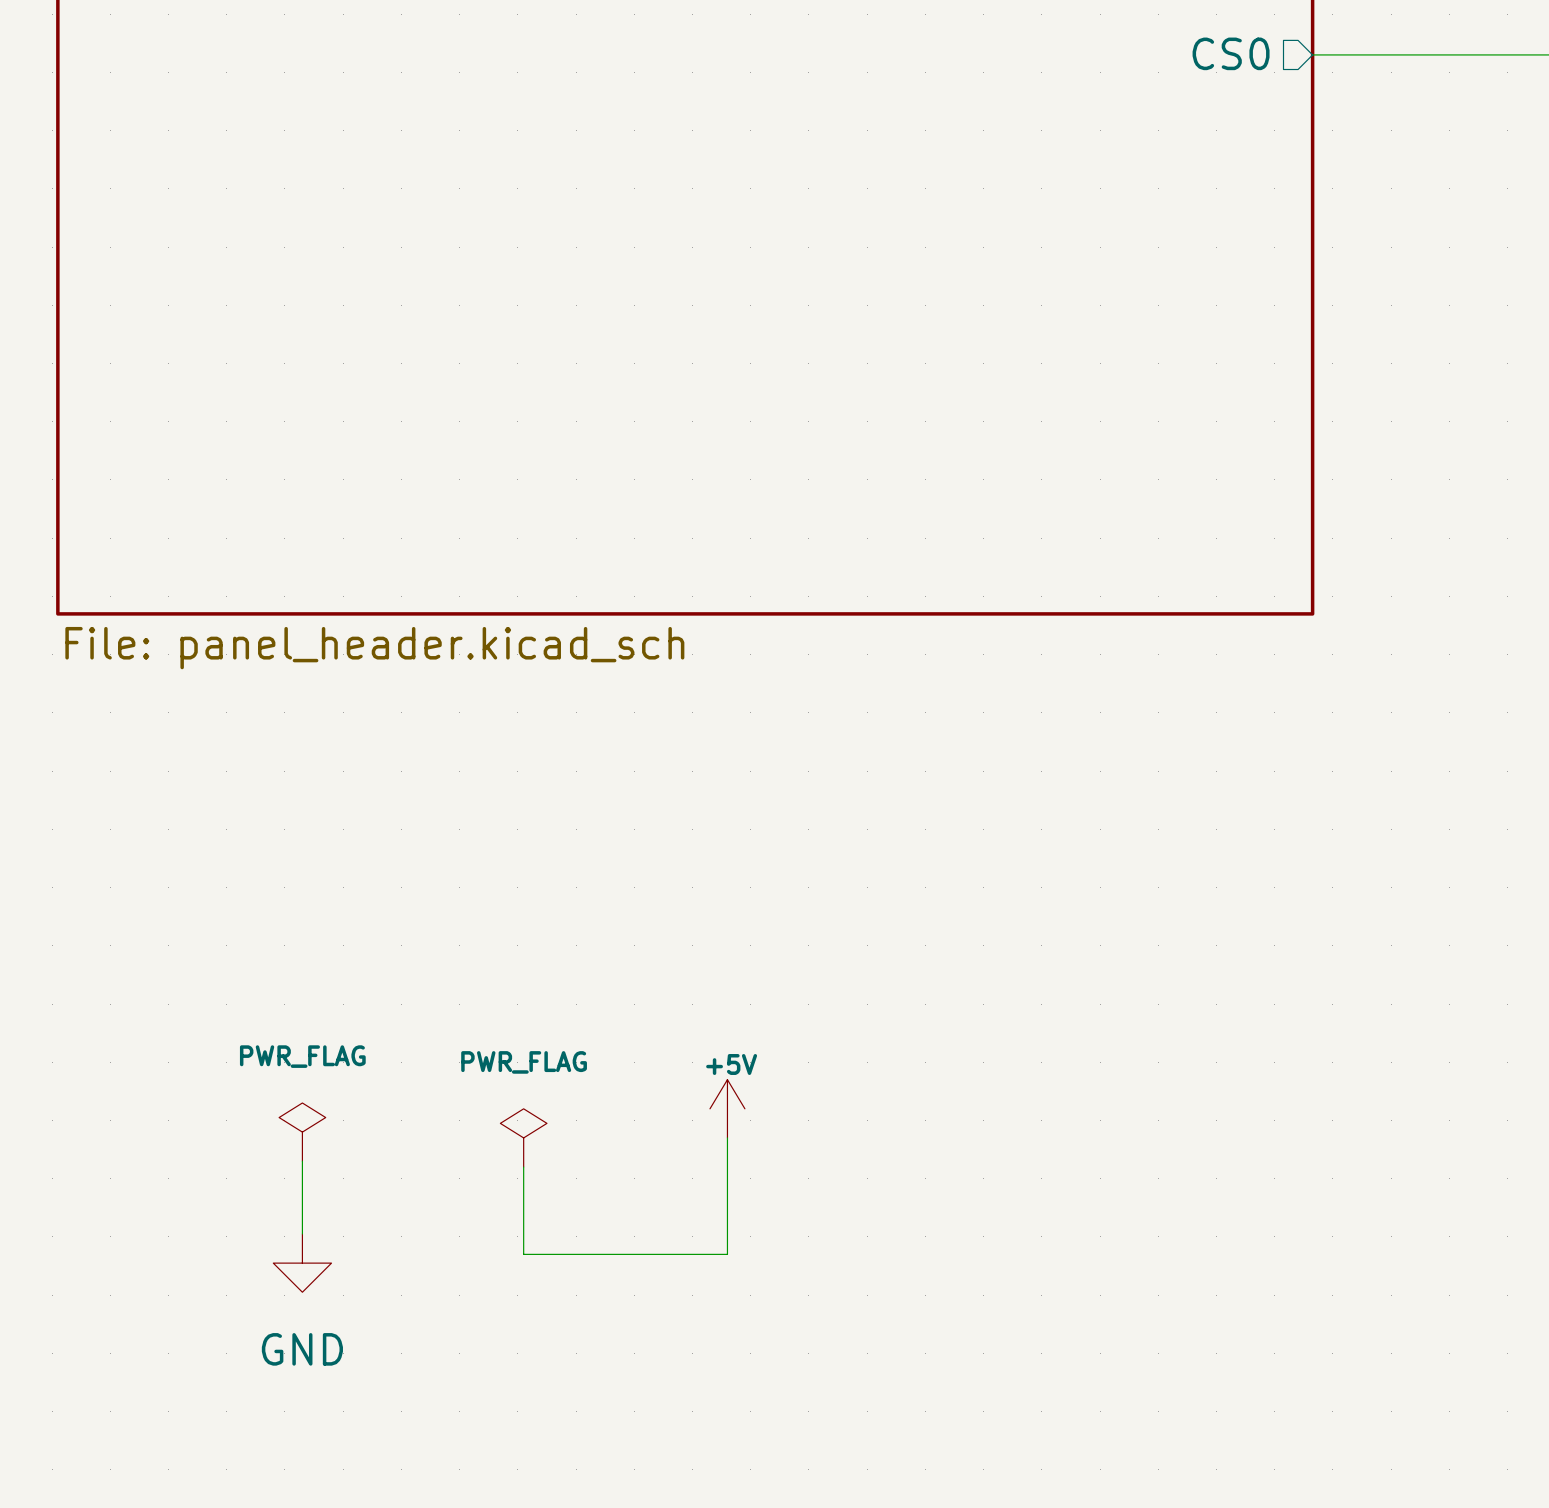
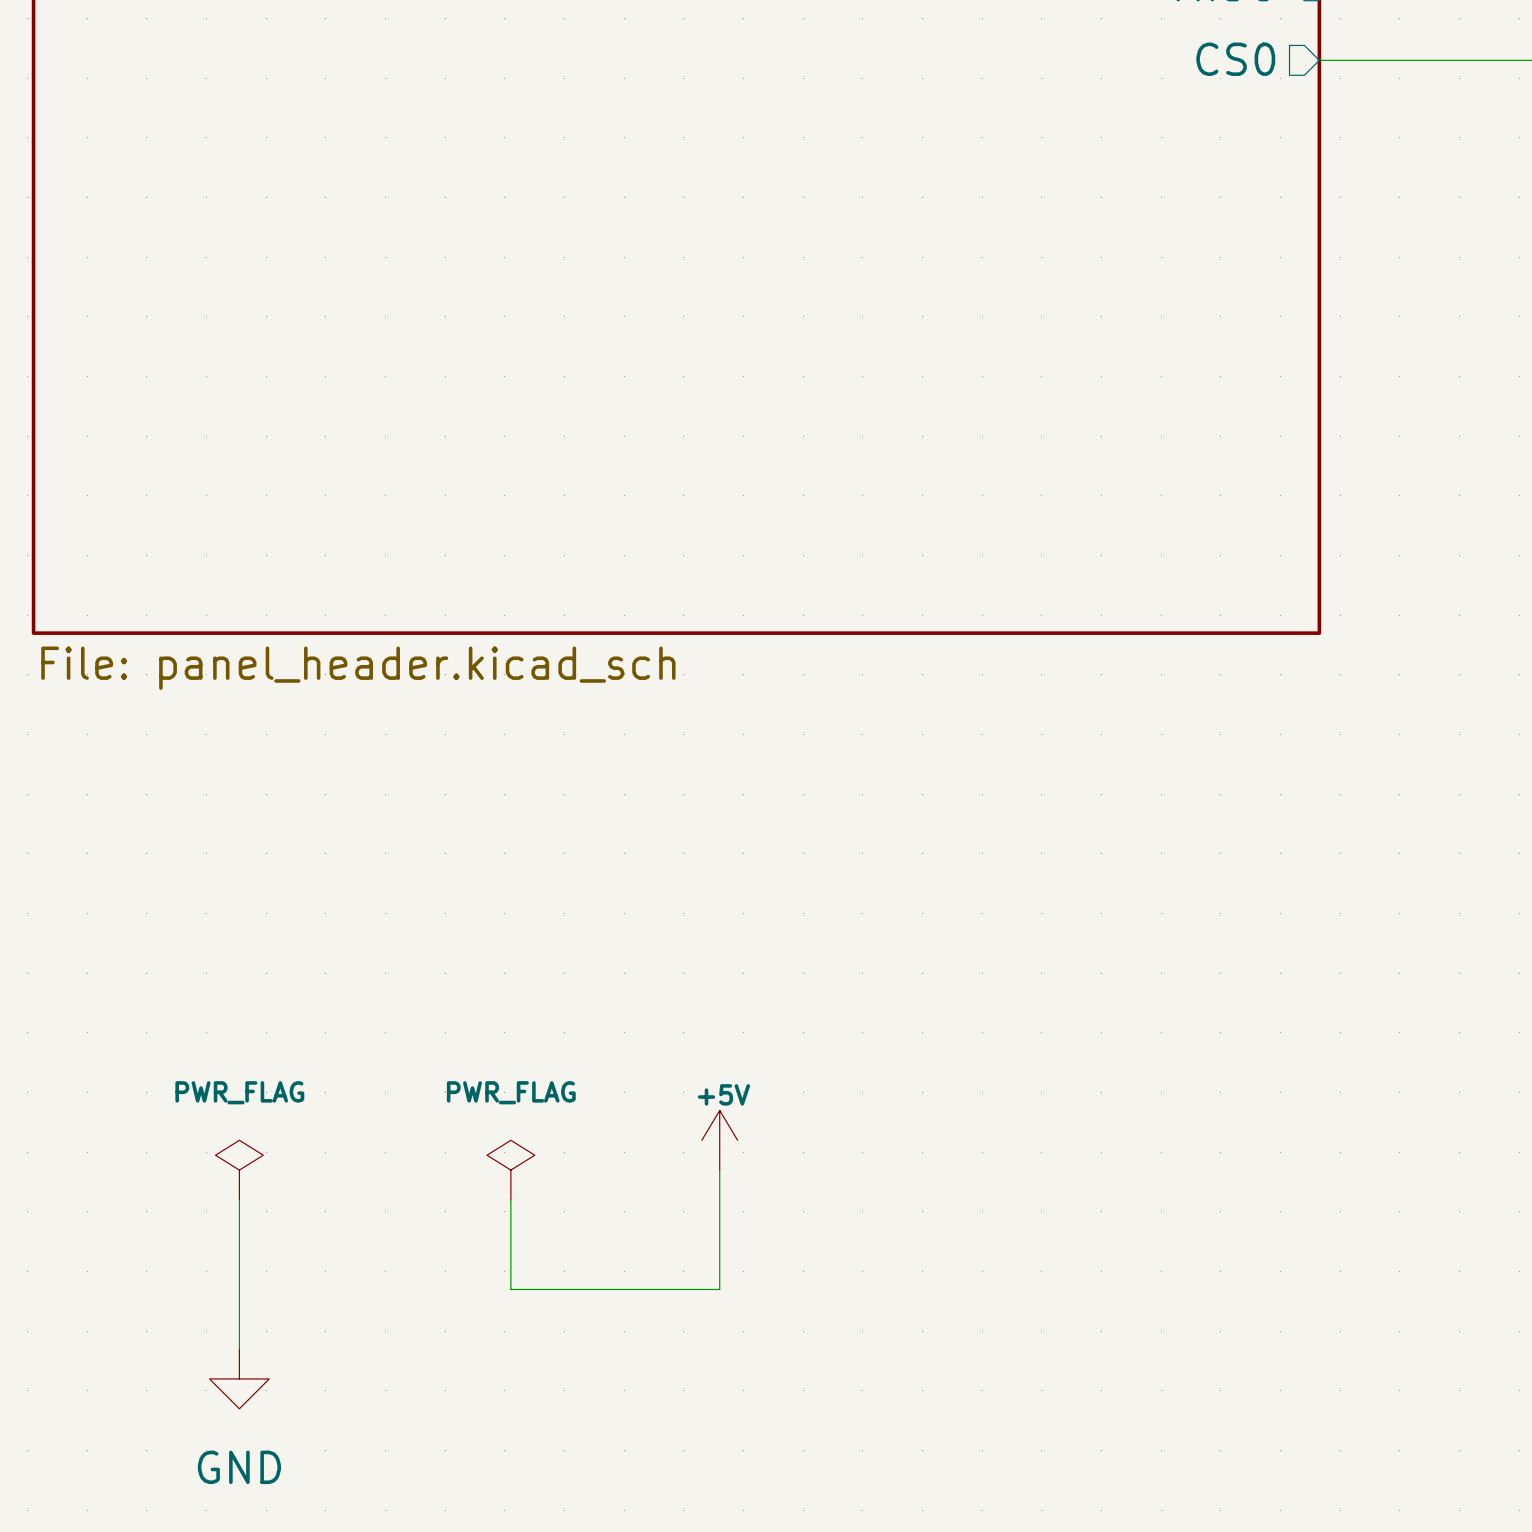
power symbol position: PWR_FLAG (302, 1132) -> PWR_FLAG (239, 1170)
wire: (302, 1161) (302, 1234) -> none
wire: none -> (239, 1199) (239, 1349)
power symbol position: GND (302, 1263) -> GND (239, 1378)

